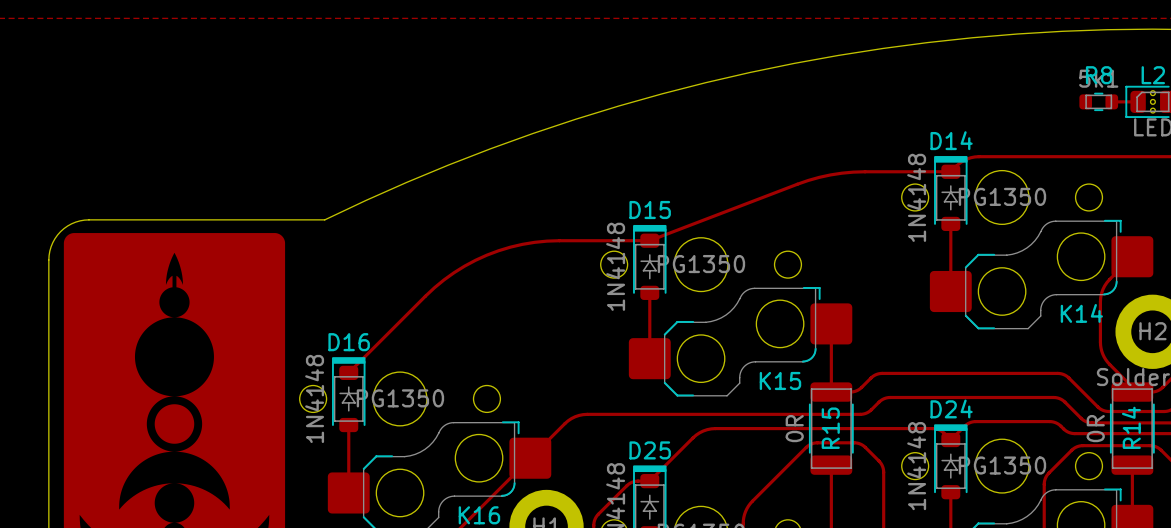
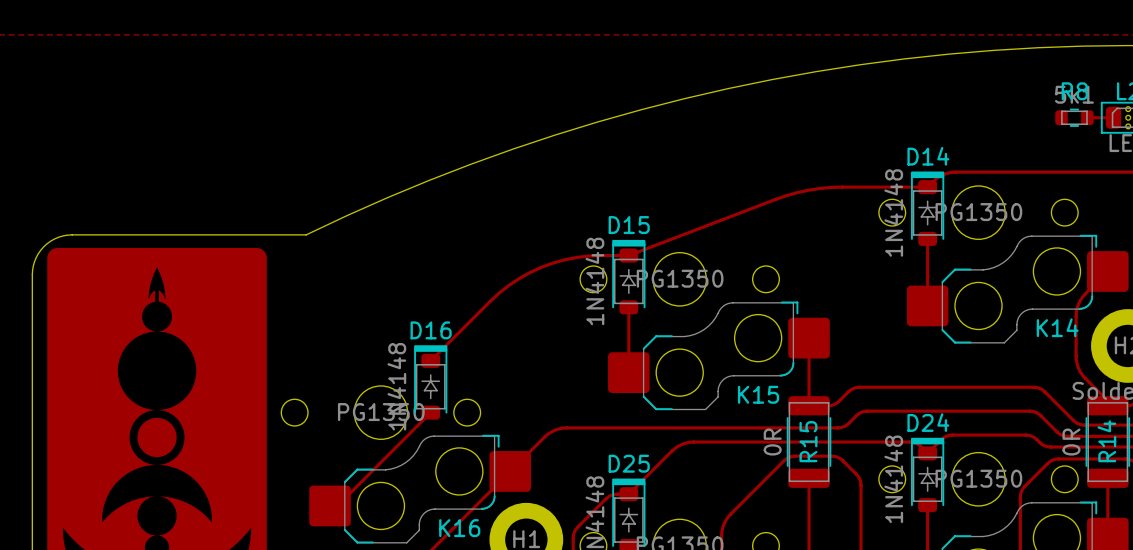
track: (621, 240) (534, 242) (498, 250) (475, 260) (454, 272) (434, 287) (348, 372) -> (601, 255) (564, 259) (540, 267) (519, 278) (490, 301) (430, 360)
D16 position: (348, 394) -> (430, 382)
track: (348, 425) (348, 492) -> (430, 412) (337, 505) (330, 505)

